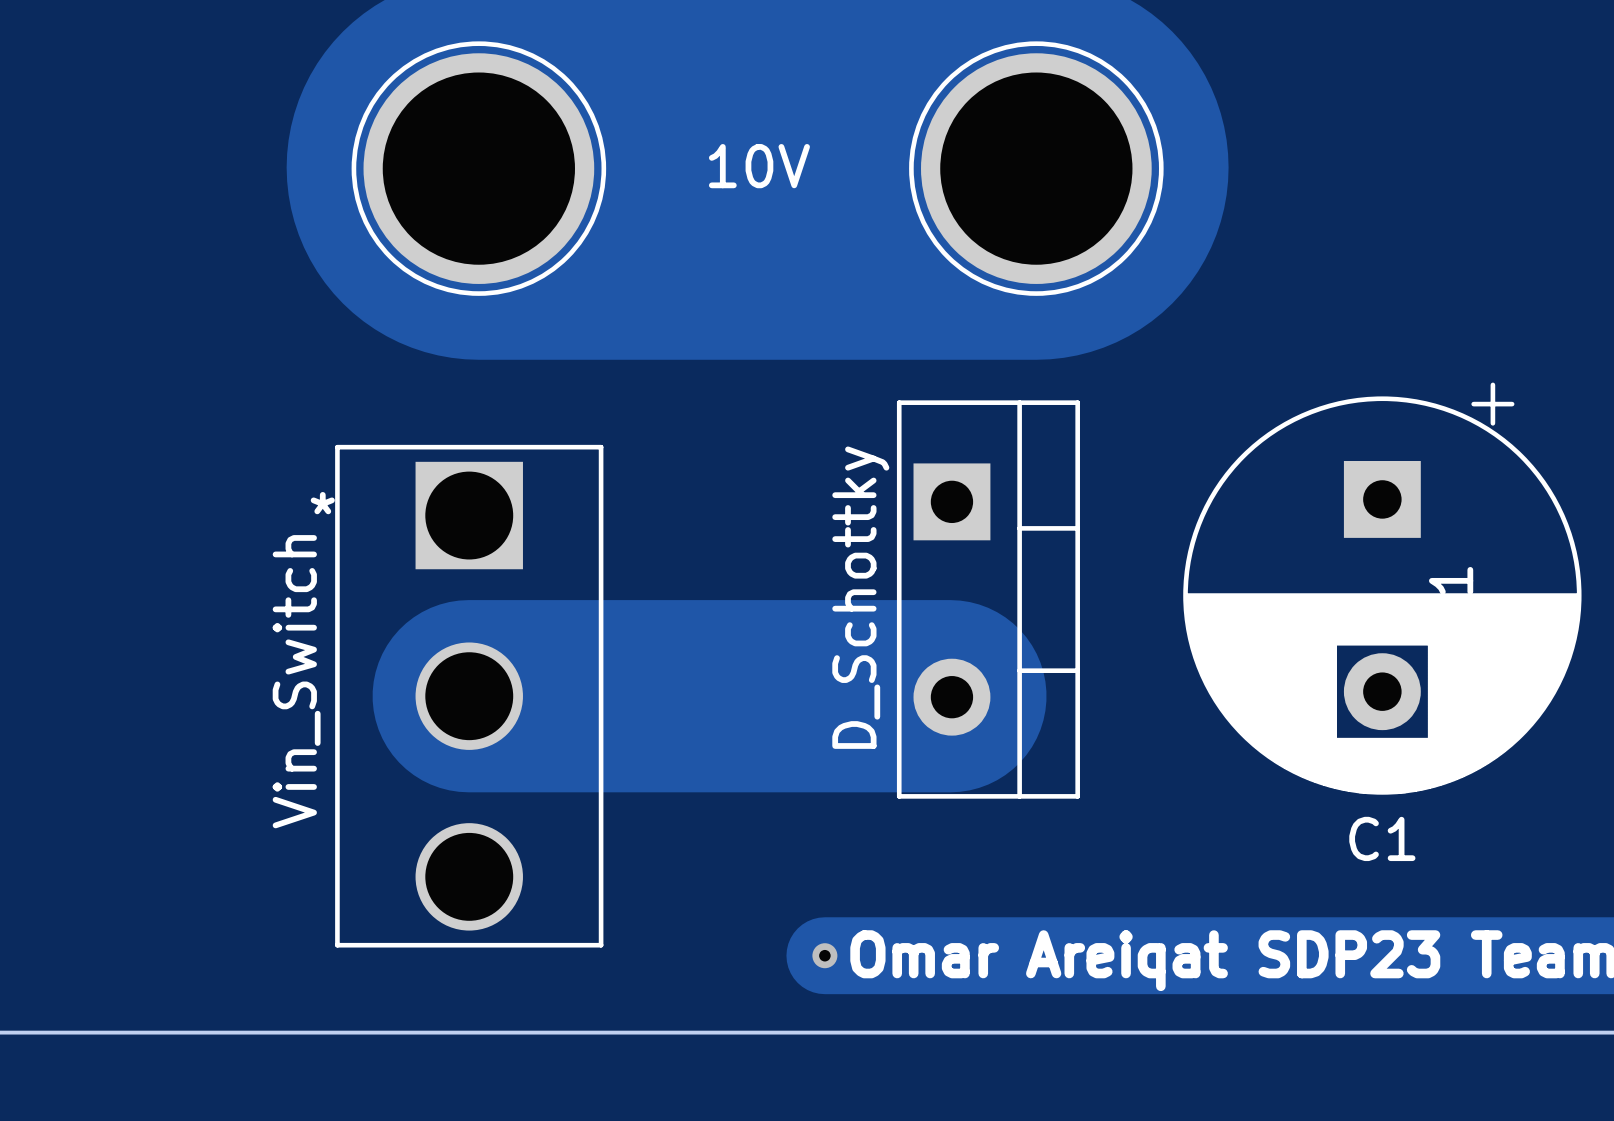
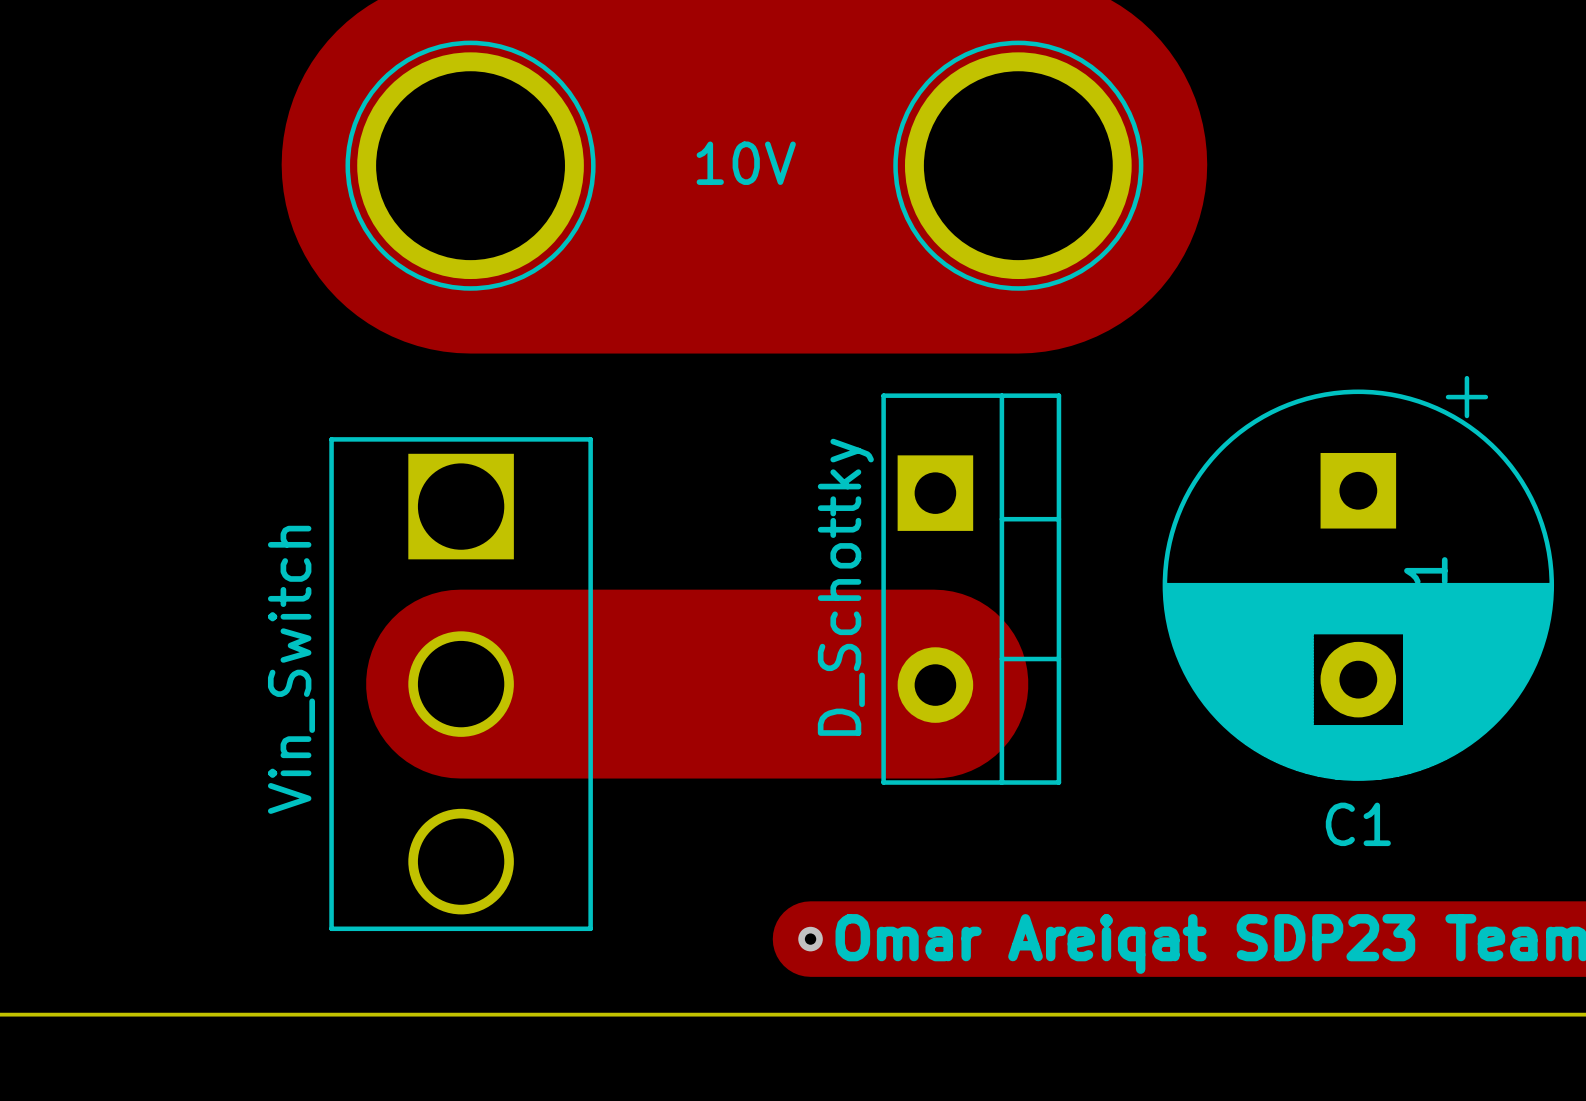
part text: * (322, 503) -> none

